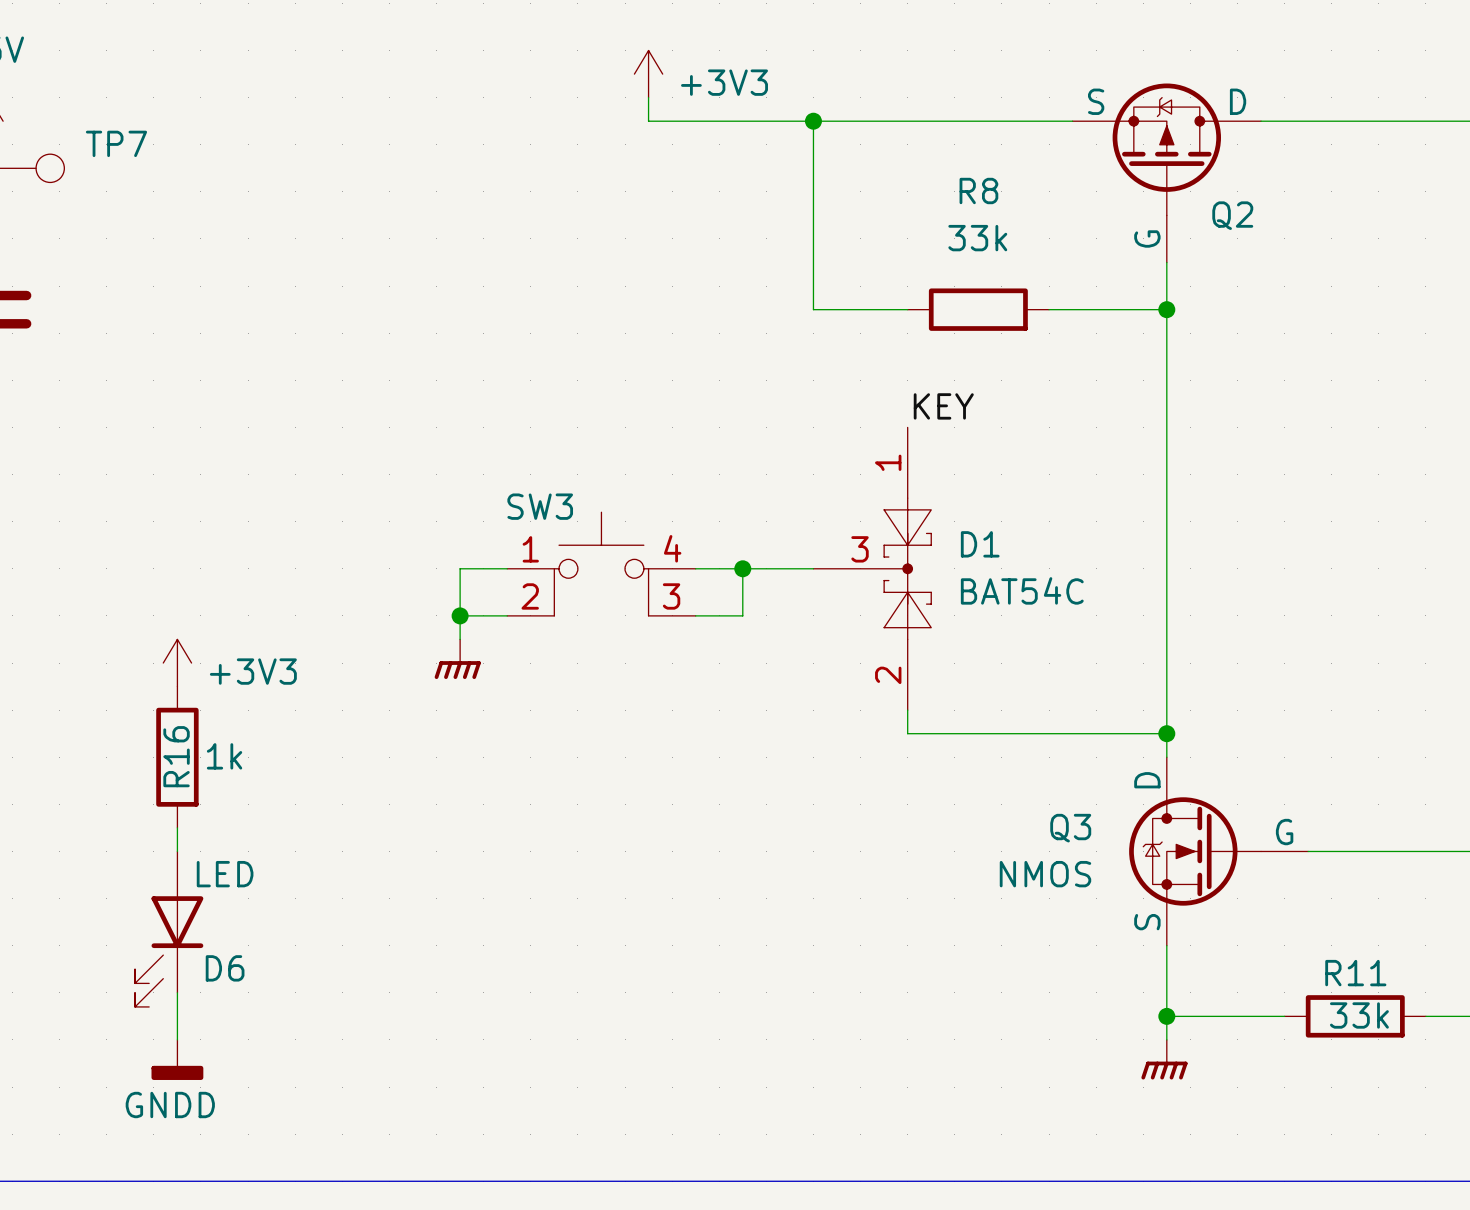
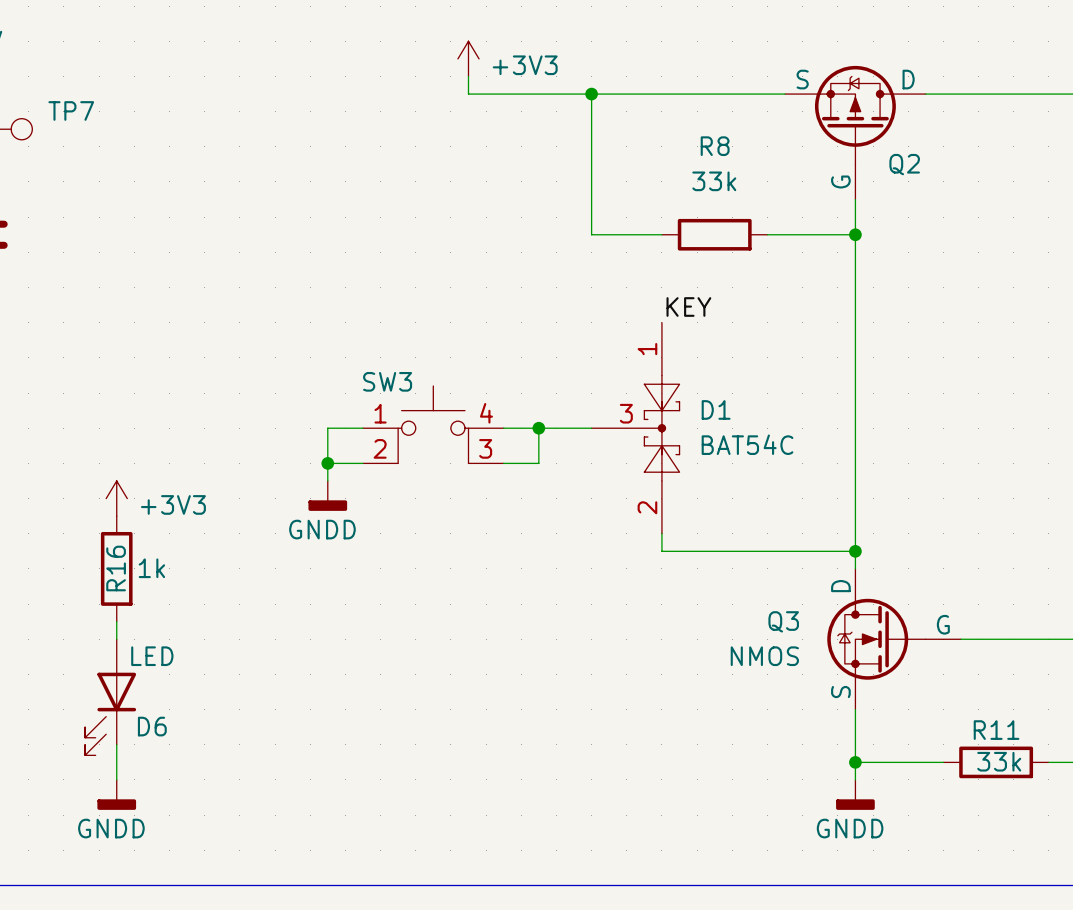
power symbol shape: [434, 639, 481, 680] -> [308, 480, 348, 511]
power symbol text: none -> GNDD (322, 529)
power symbol shape: [1141, 1039, 1188, 1080] -> [836, 779, 875, 810]
power symbol text: none -> GNDD (850, 828)

